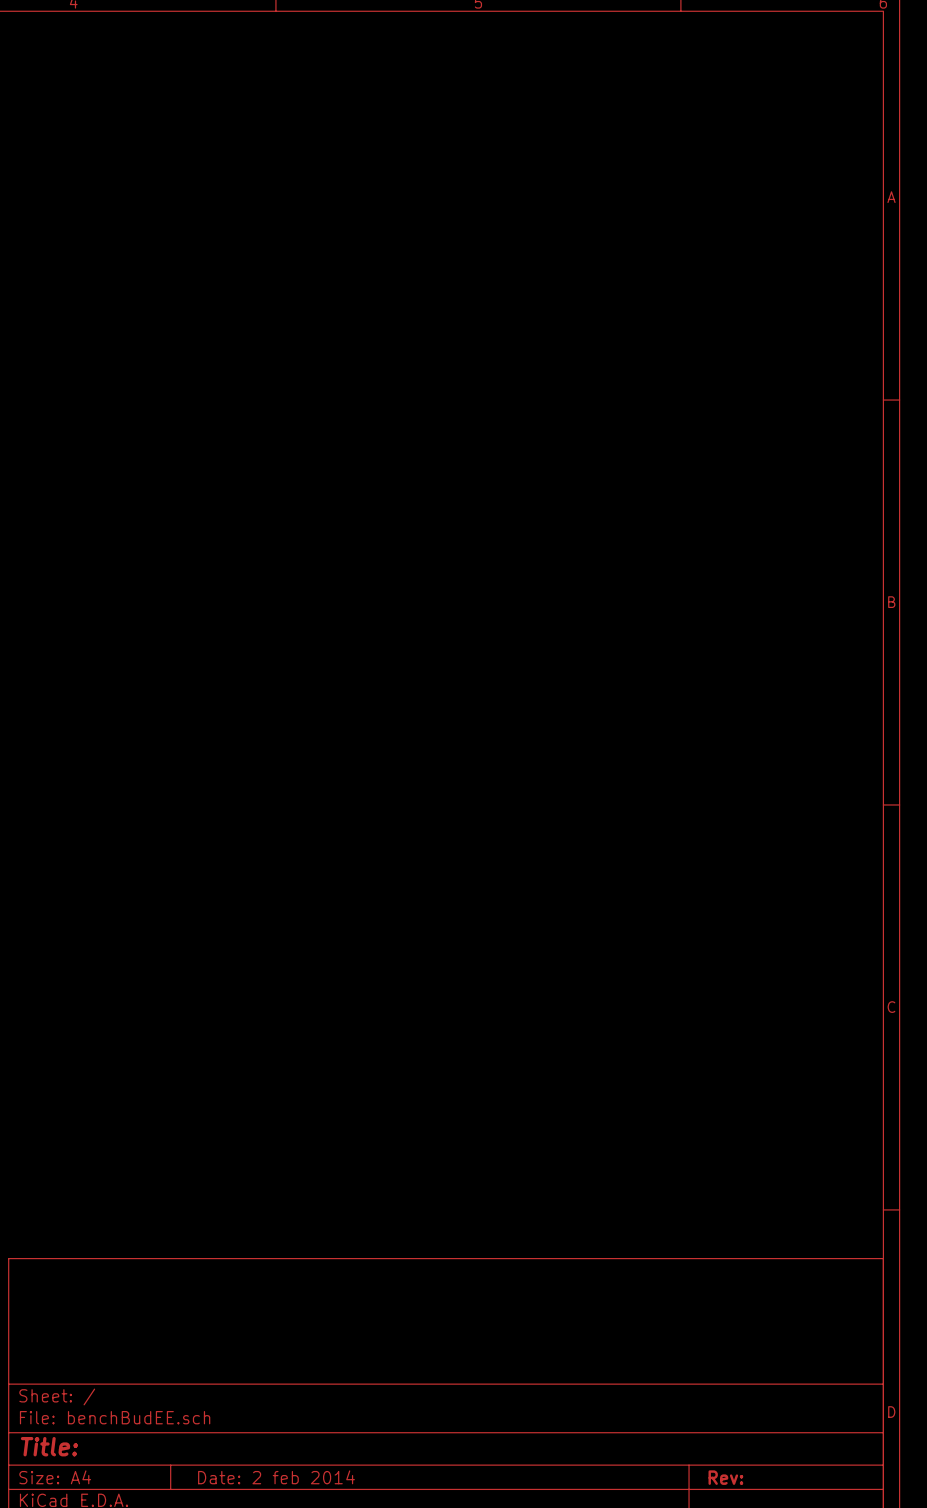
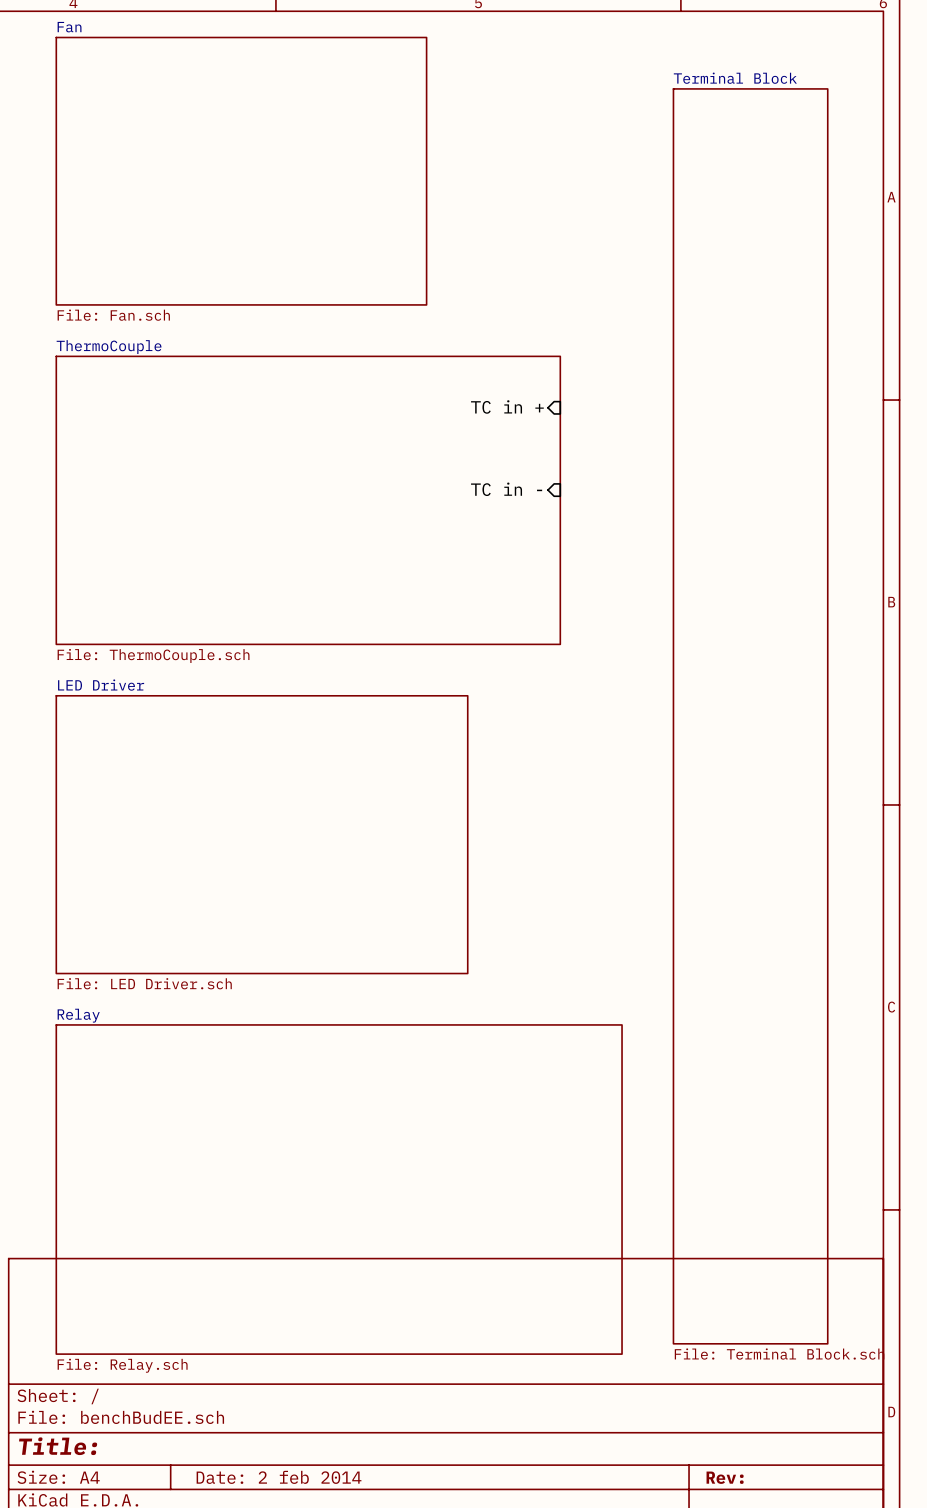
sheet Fan: none -> File: Fan.sch (241, 171)
sheet pin: none -> TC in + (507, 407)
sheet pin: none -> TC in - (506, 489)
sheet ThermoCouple: none -> File: ThermoCouple.sch (308, 500)
sheet Terminal Block: none -> File: Terminal Block.sch (750, 716)
sheet LED Driver: none -> File: LED Driver.sch (262, 834)
sheet Relay: none -> File: Relay.sch (339, 1189)

